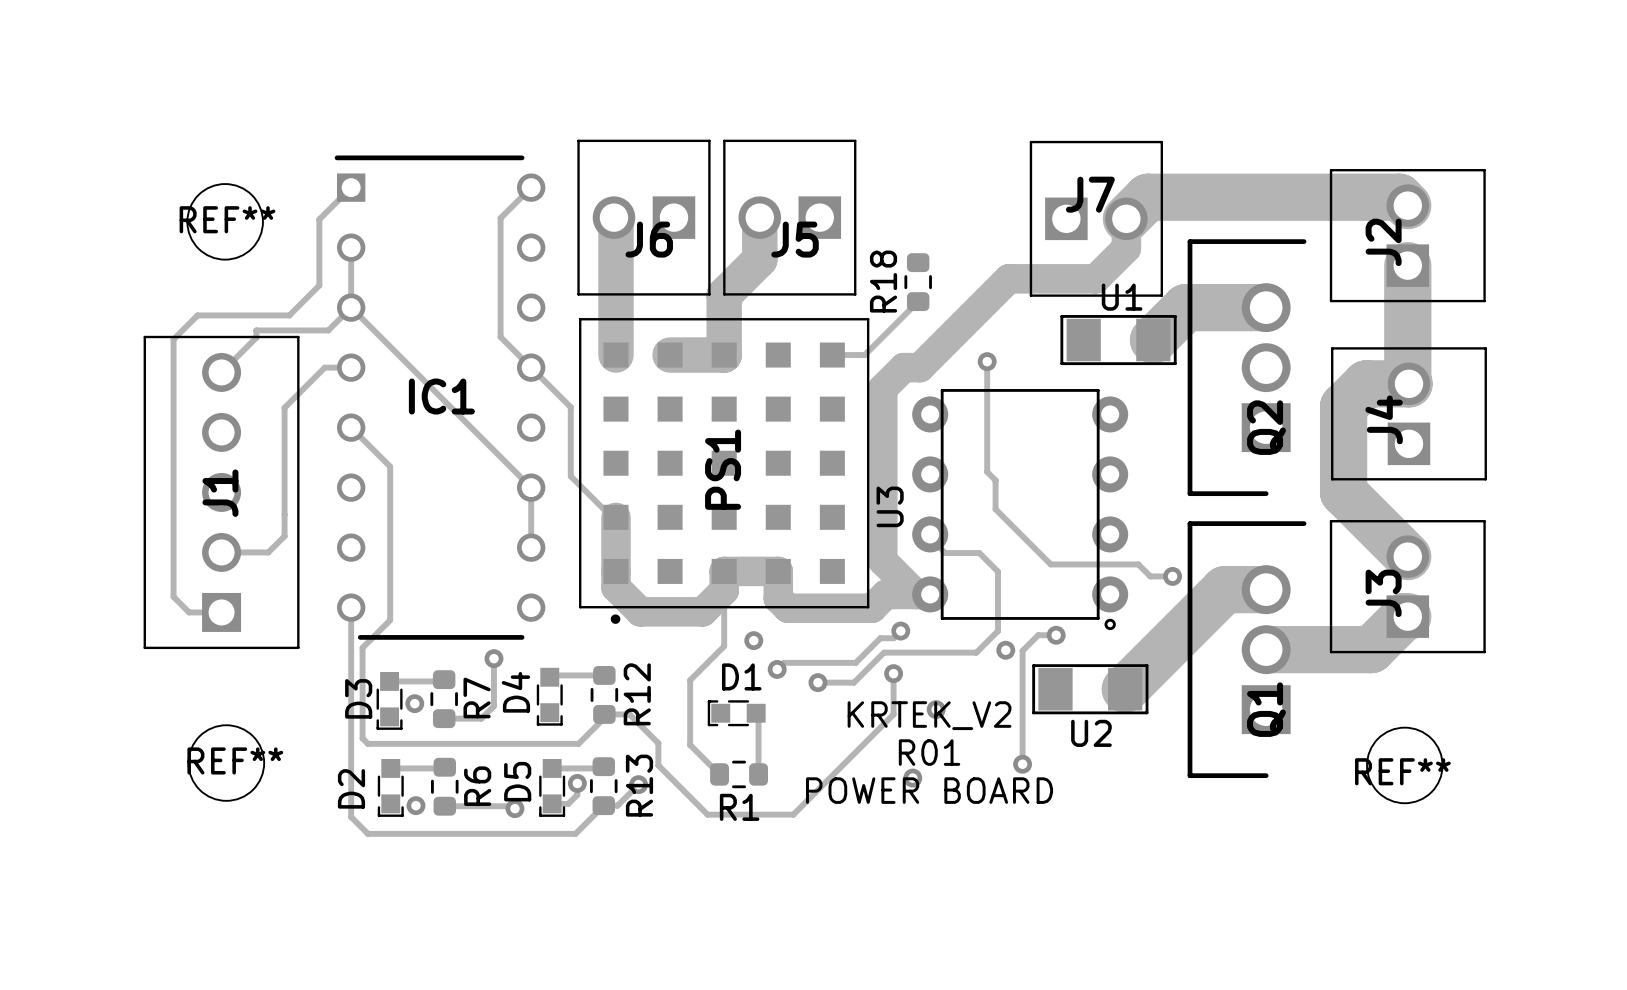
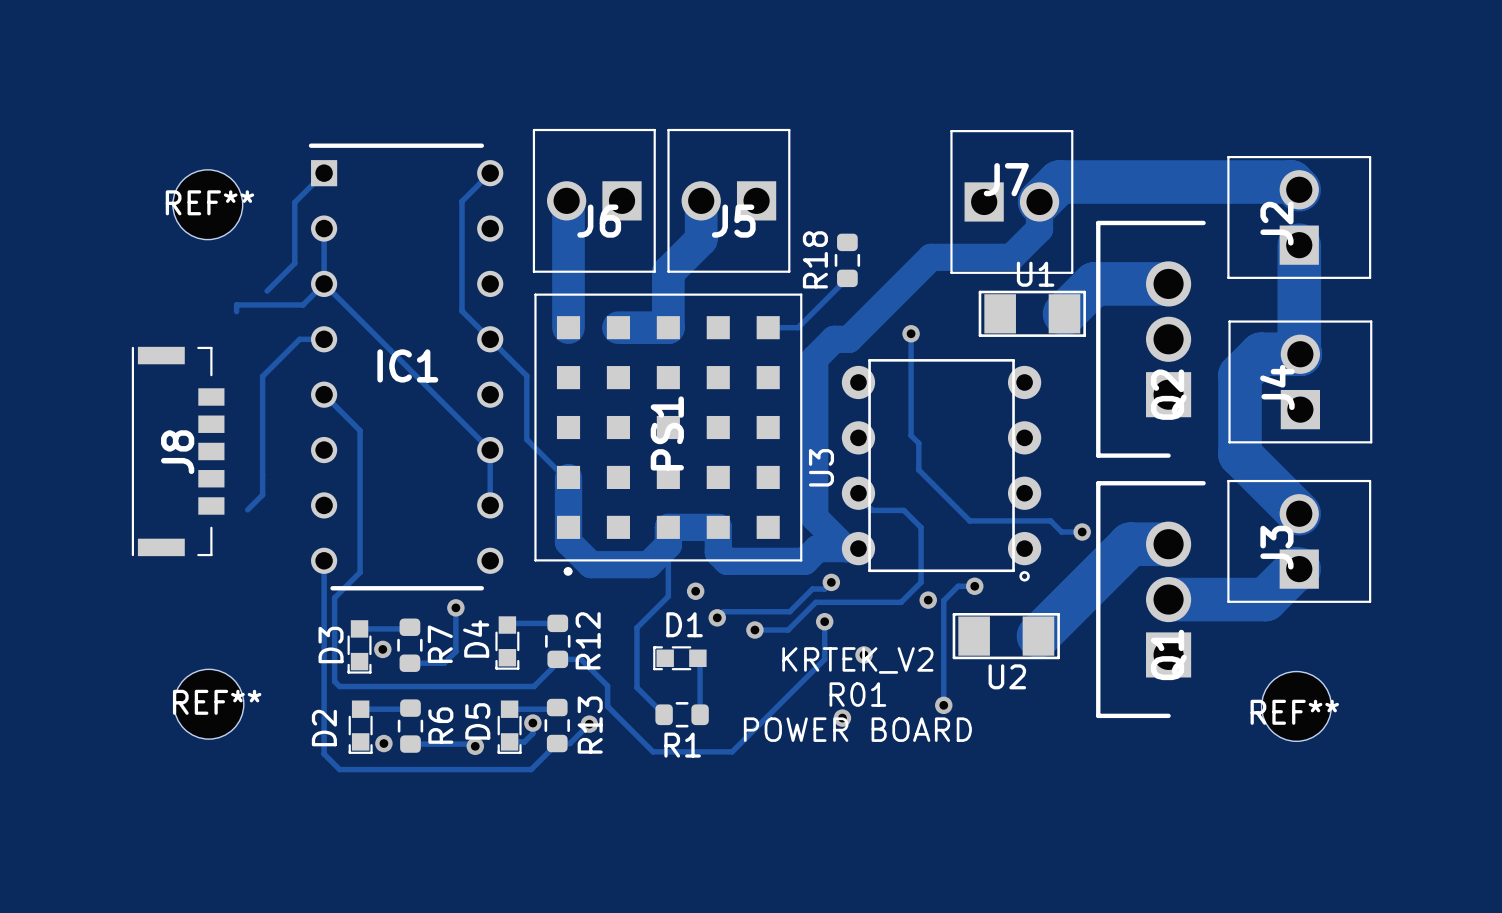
track: (289, 315) (197, 315) (173, 339) (173, 596) (189, 612) (221, 612) -> none
track: (256, 337) (221, 372) -> none
J8: none -> (178, 451)
J1: (221, 492) -> none
track: (221, 552) (268, 552) -> none

